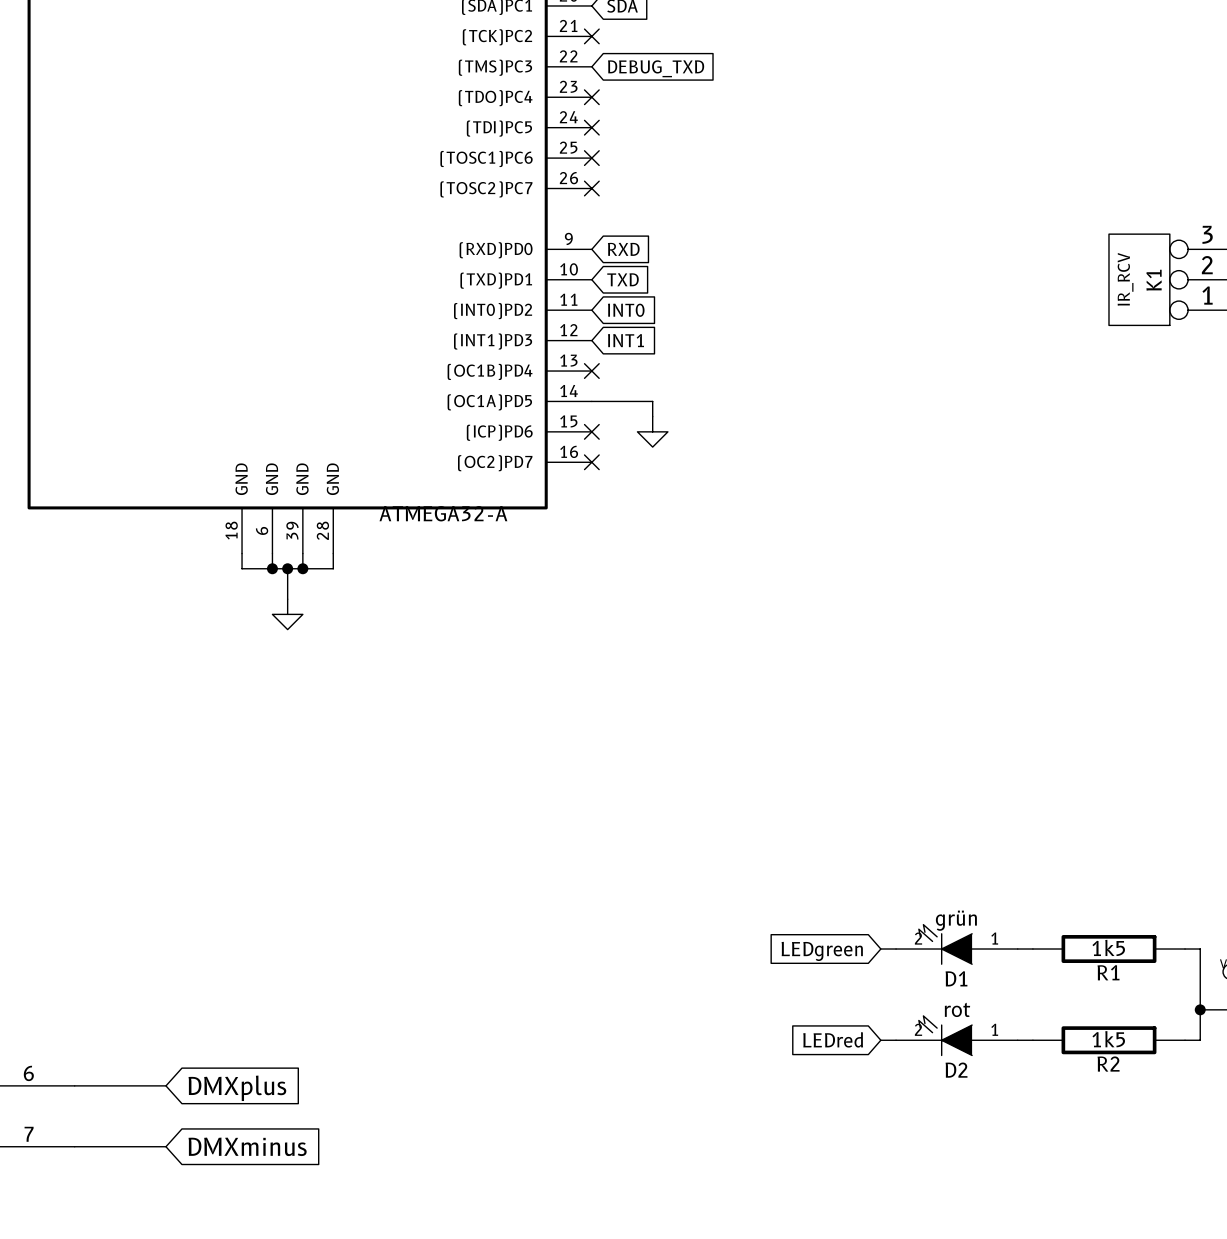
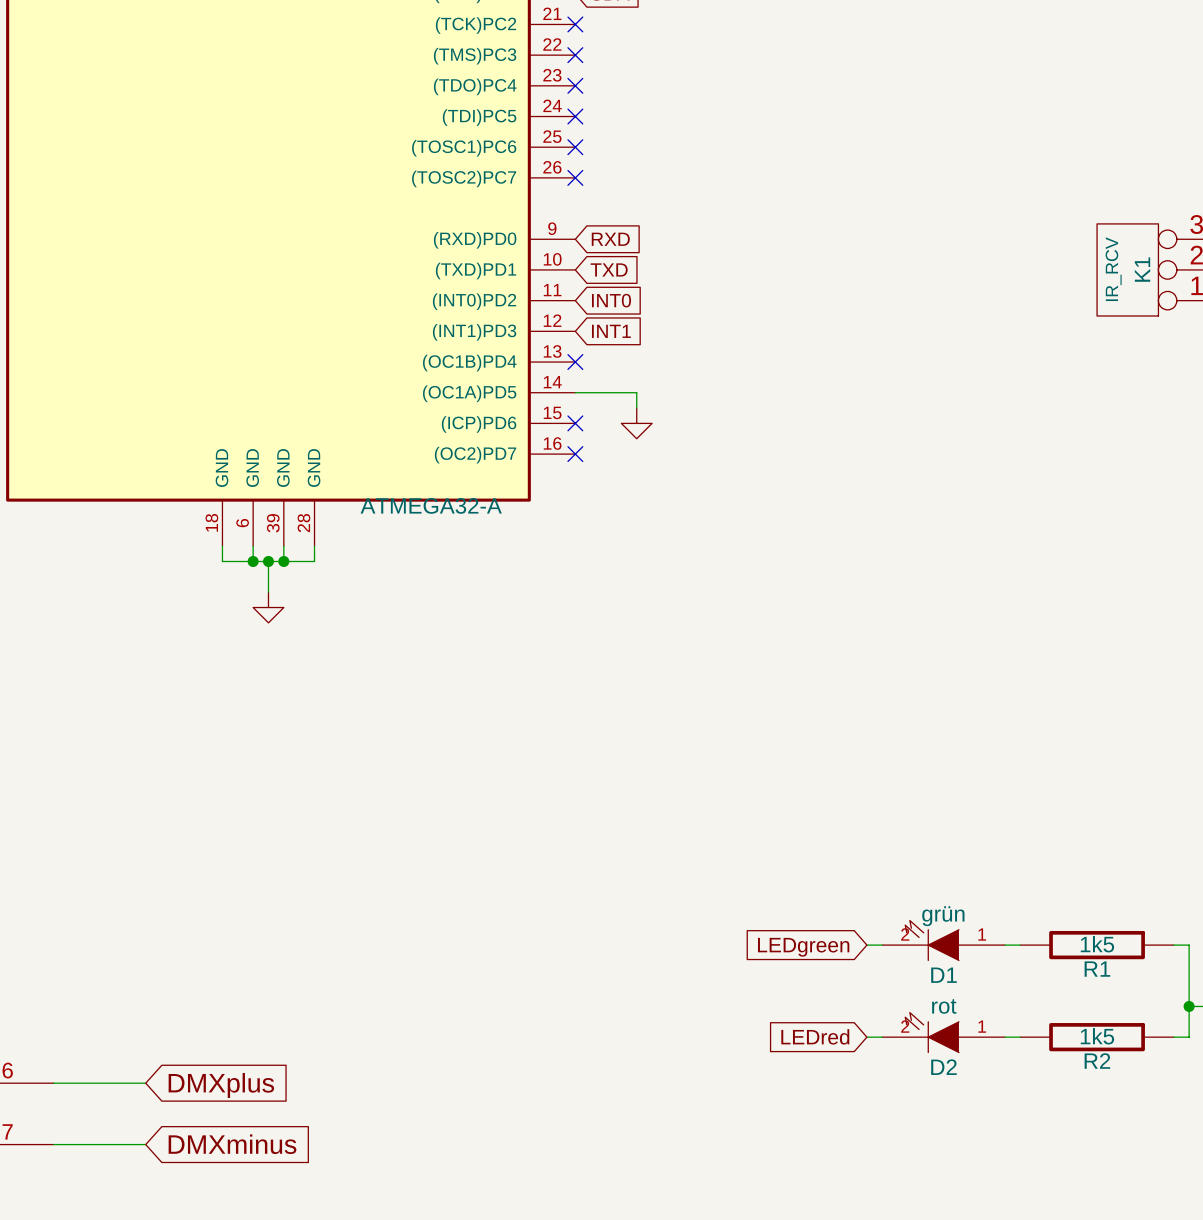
no-connect mark: none -> (575, 55)
global label: DEBUG_TXD (656, 68) -> none

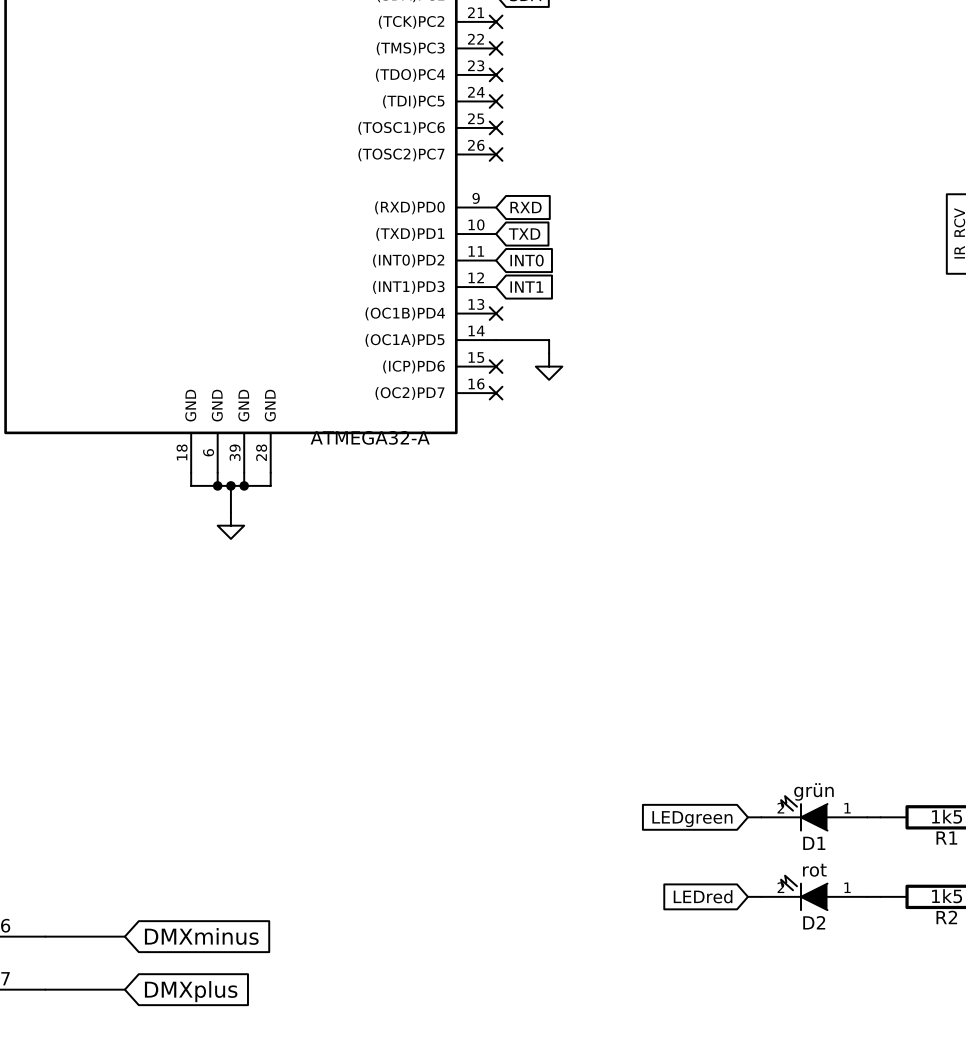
global label: DMXplus (221, 1085) -> DMXminus (201, 936)
global label: DMXminus (232, 1144) -> DMXplus (191, 991)

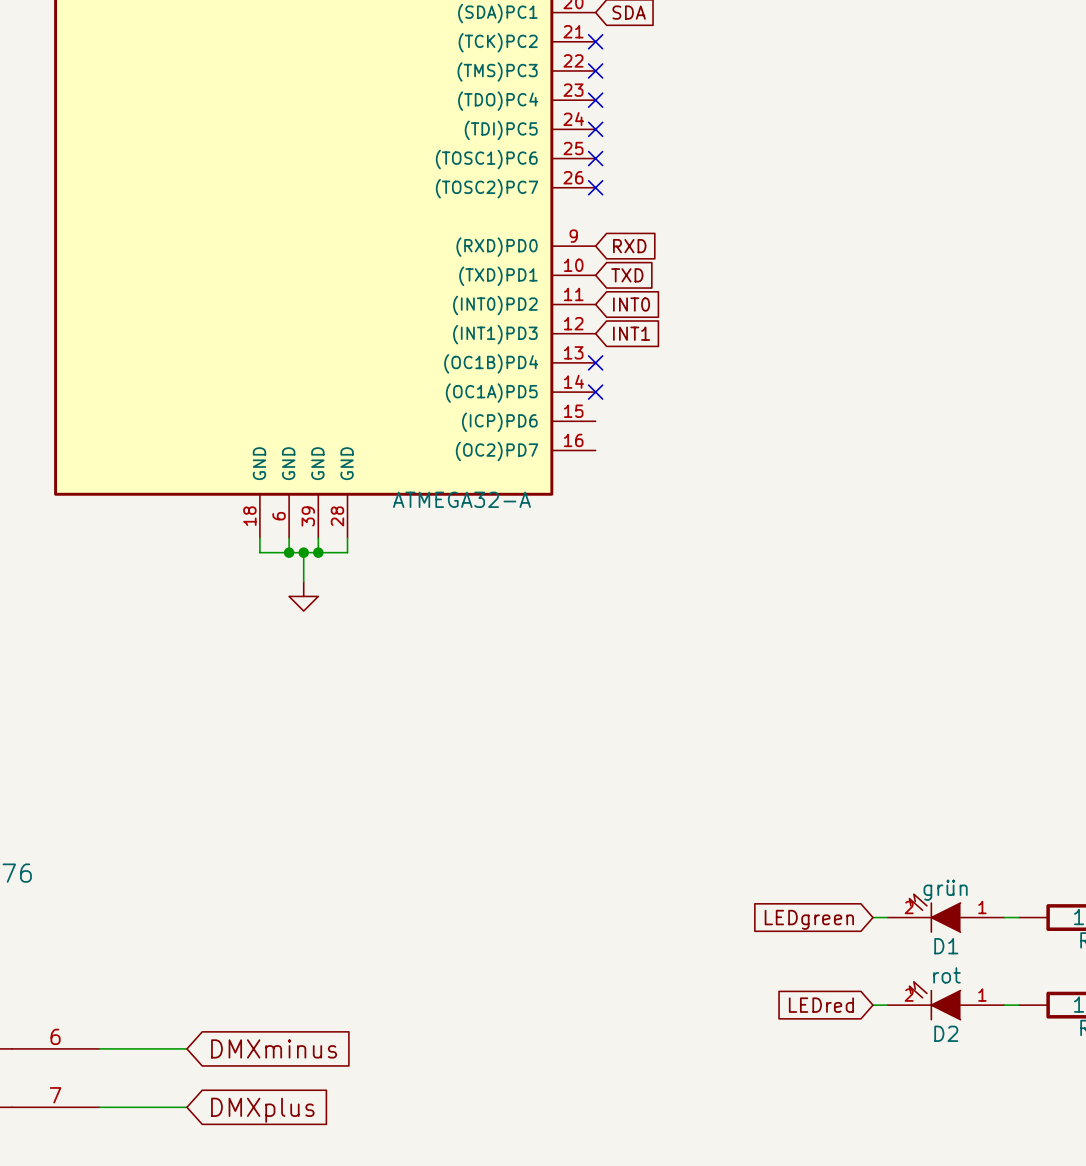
wire: (496, 340) (549, 340) (549, 353) -> none
no-connect mark: none -> (595, 392)
no-connect mark: (496, 366) -> none
power symbol: (549, 366) -> none
no-connect mark: (496, 393) -> none

